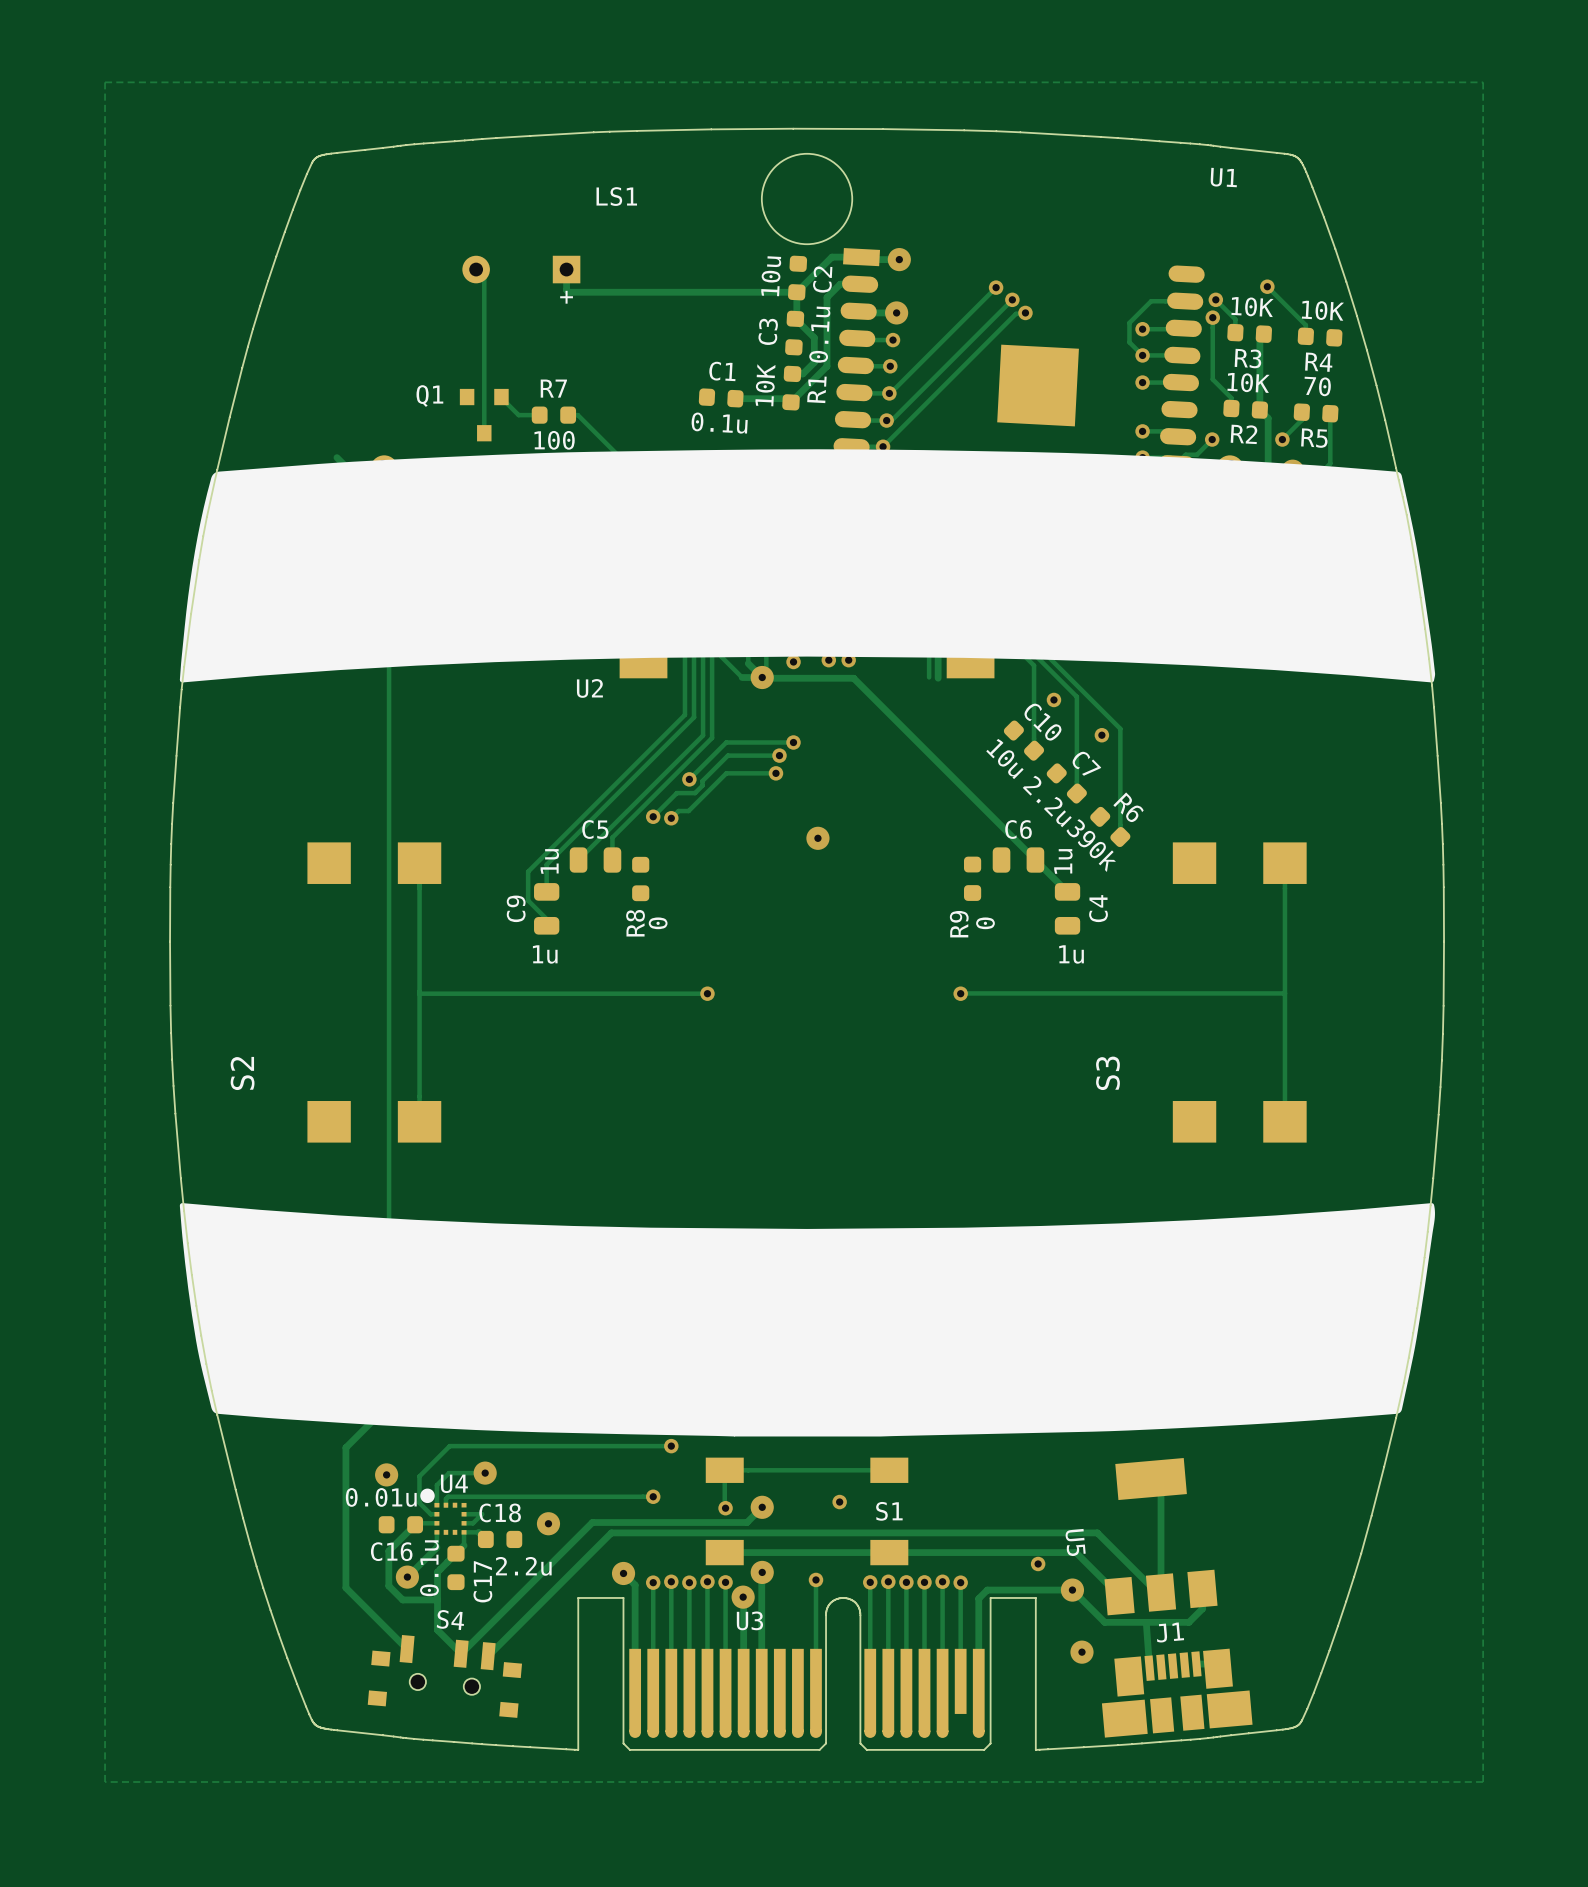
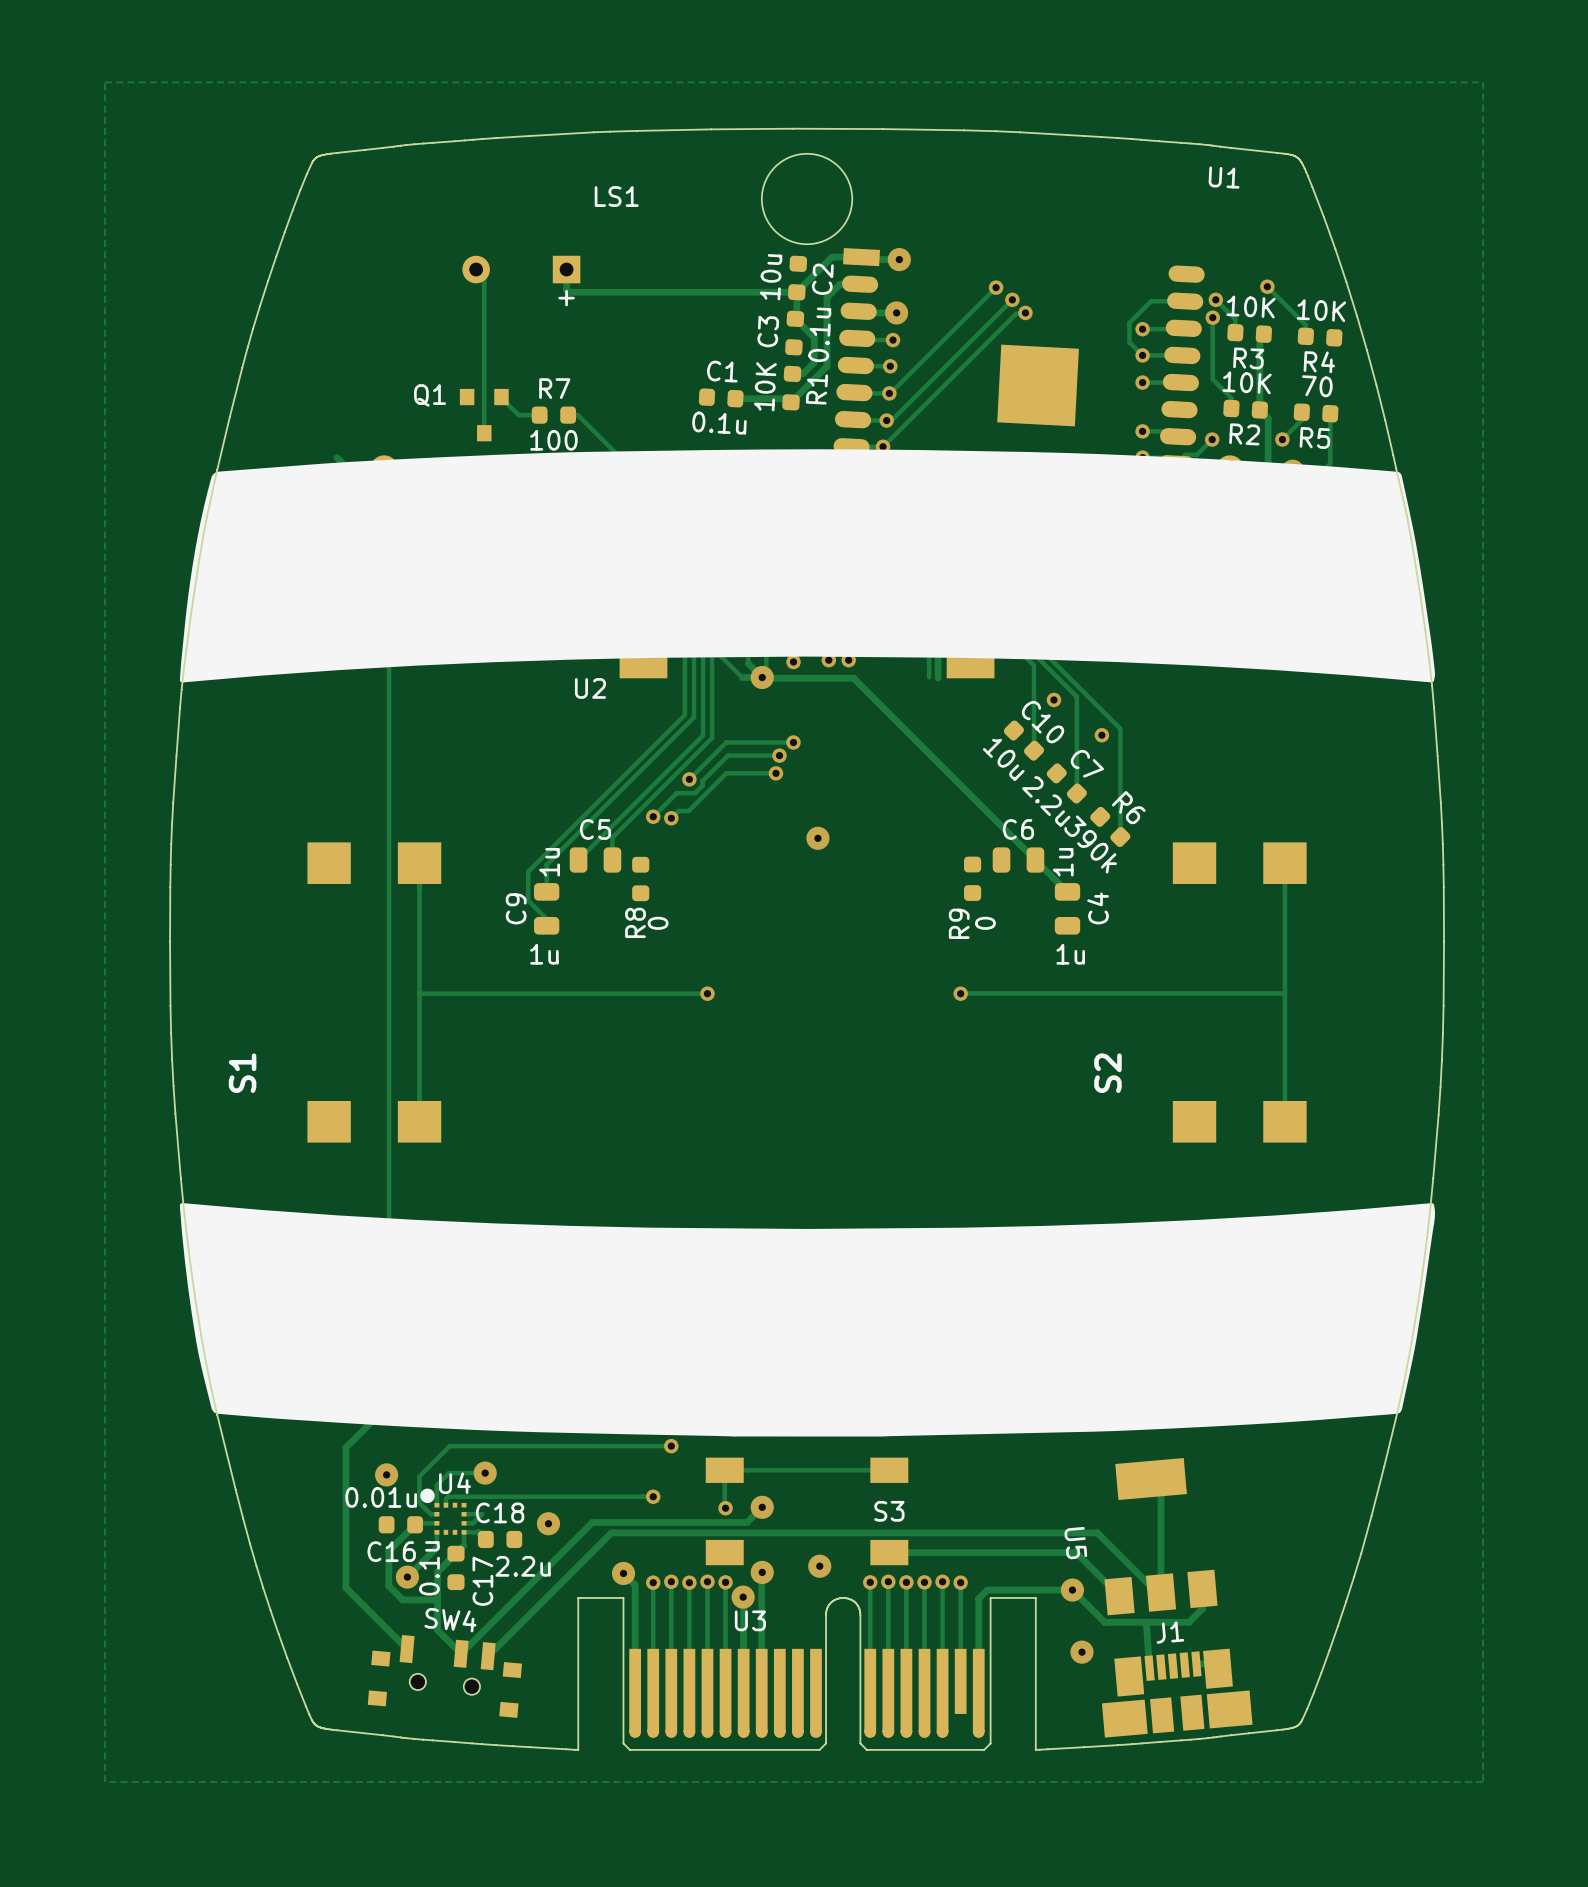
S2 name: S2 (242, 1073) -> S1 (242, 1073)
S3 name: S3 (1107, 1073) -> S2 (1107, 1073)
via: (839, 1502) -> none
S1 name: S1 (889, 1511) -> S3 (889, 1511)
track: (724, 1552) (889, 1552) -> none
via: (1038, 1563) -> none
via size: [808, 1572, 824, 1588] -> [808, 1554, 832, 1578]
track: (815, 1579) (815, 1690) -> none
S4 name: S4 (450, 1619) -> SW4 (450, 1620)

